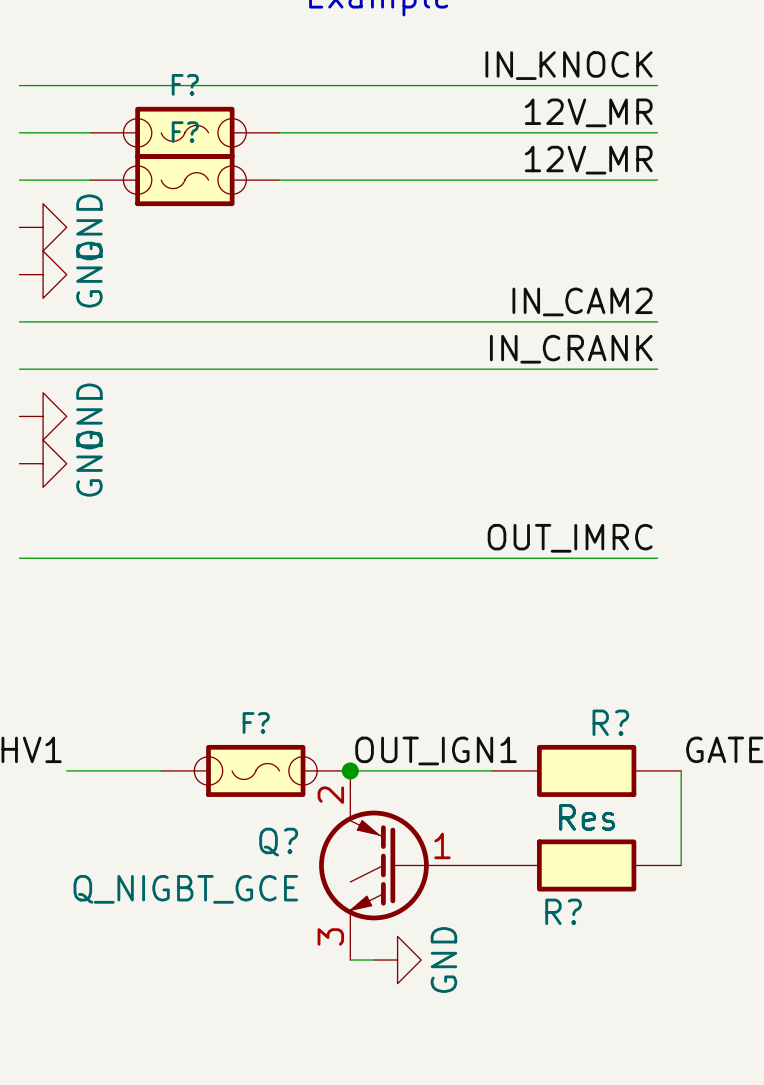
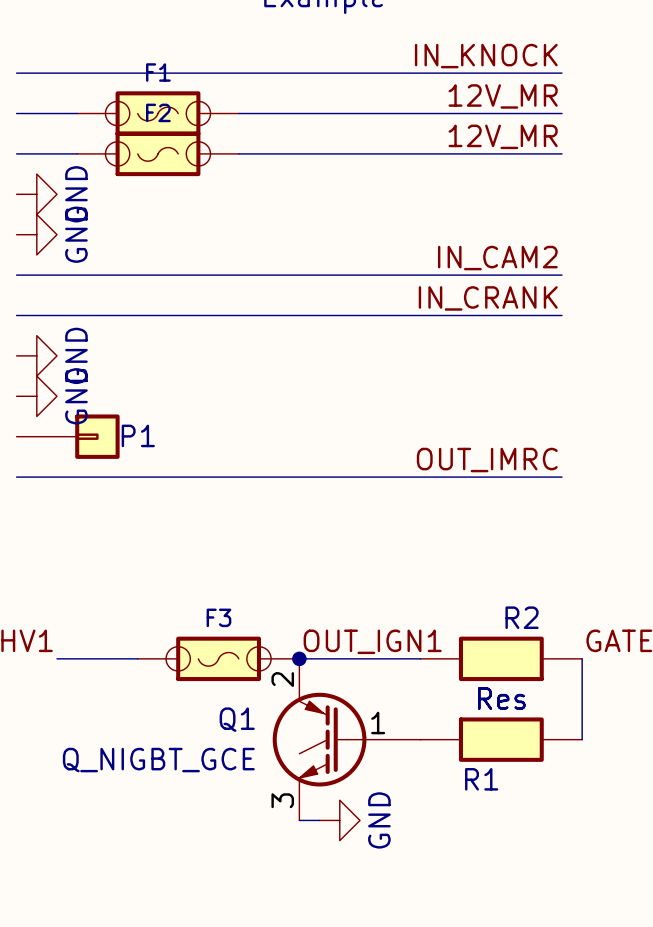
F? name: F? (185, 84) -> F1 (158, 72)
F? name: F? (185, 132) -> F2 (158, 112)
P1: none -> (68, 436)
F? name: F? (256, 722) -> F3 (218, 617)
R? name: R? (610, 722) -> R2 (522, 617)
Q? name: Q? (278, 842) -> Q1 (237, 719)
R? name: R? (563, 911) -> R1 (481, 779)

